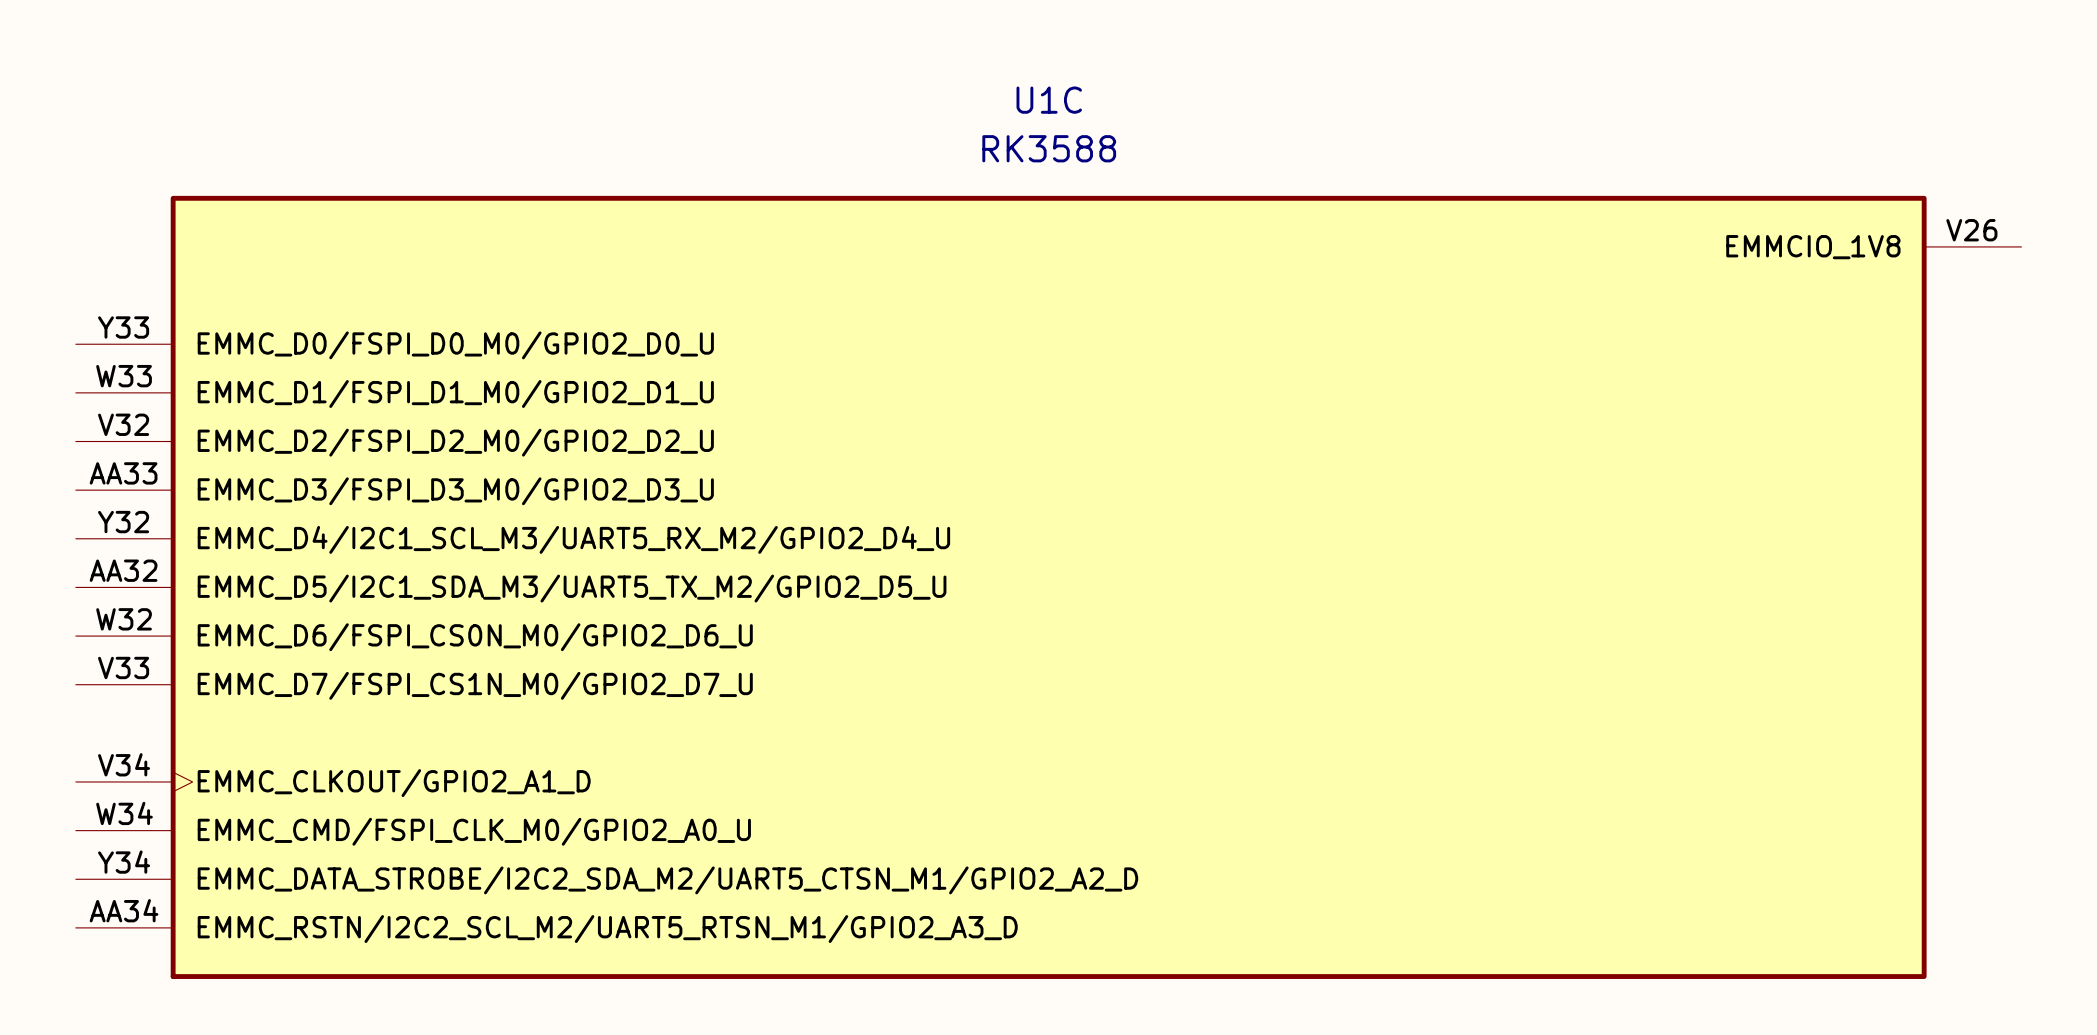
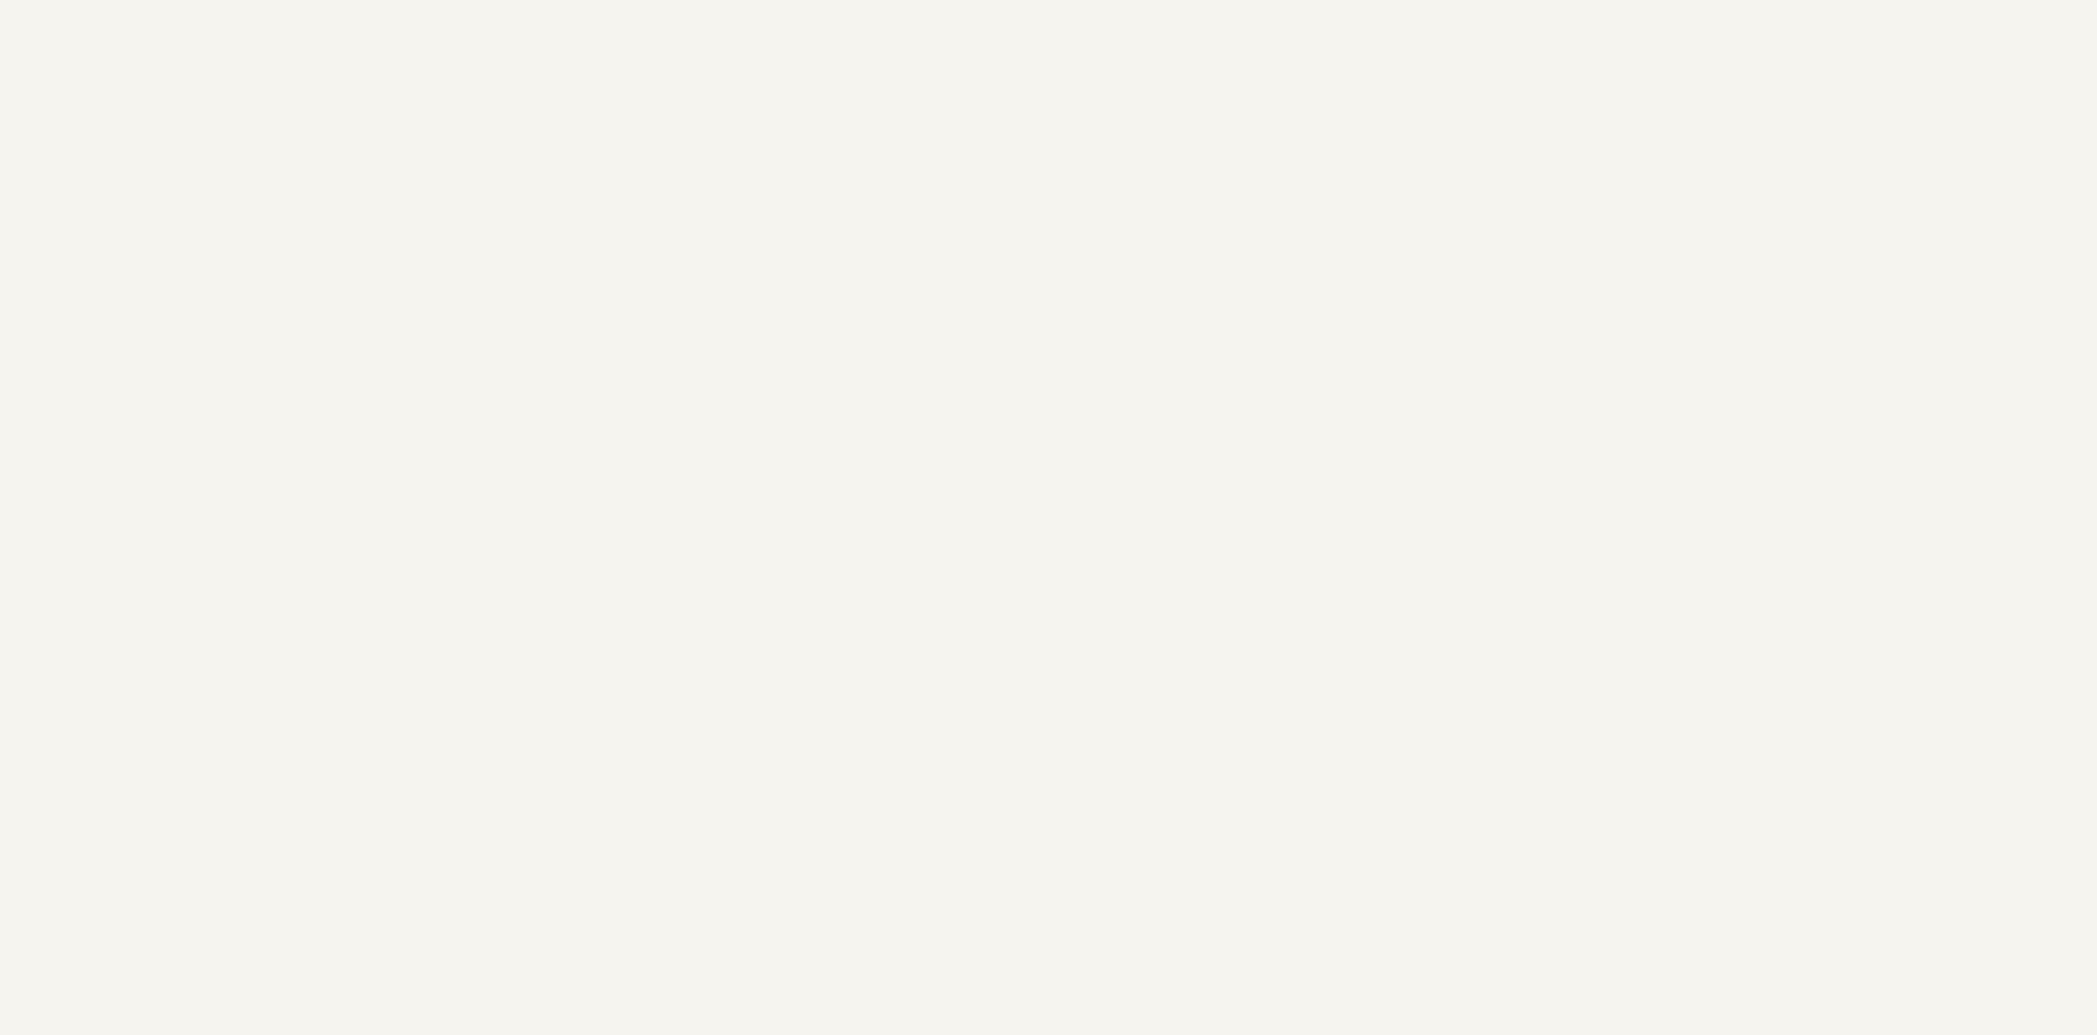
U1C: RK3588 (1048, 587) -> none

